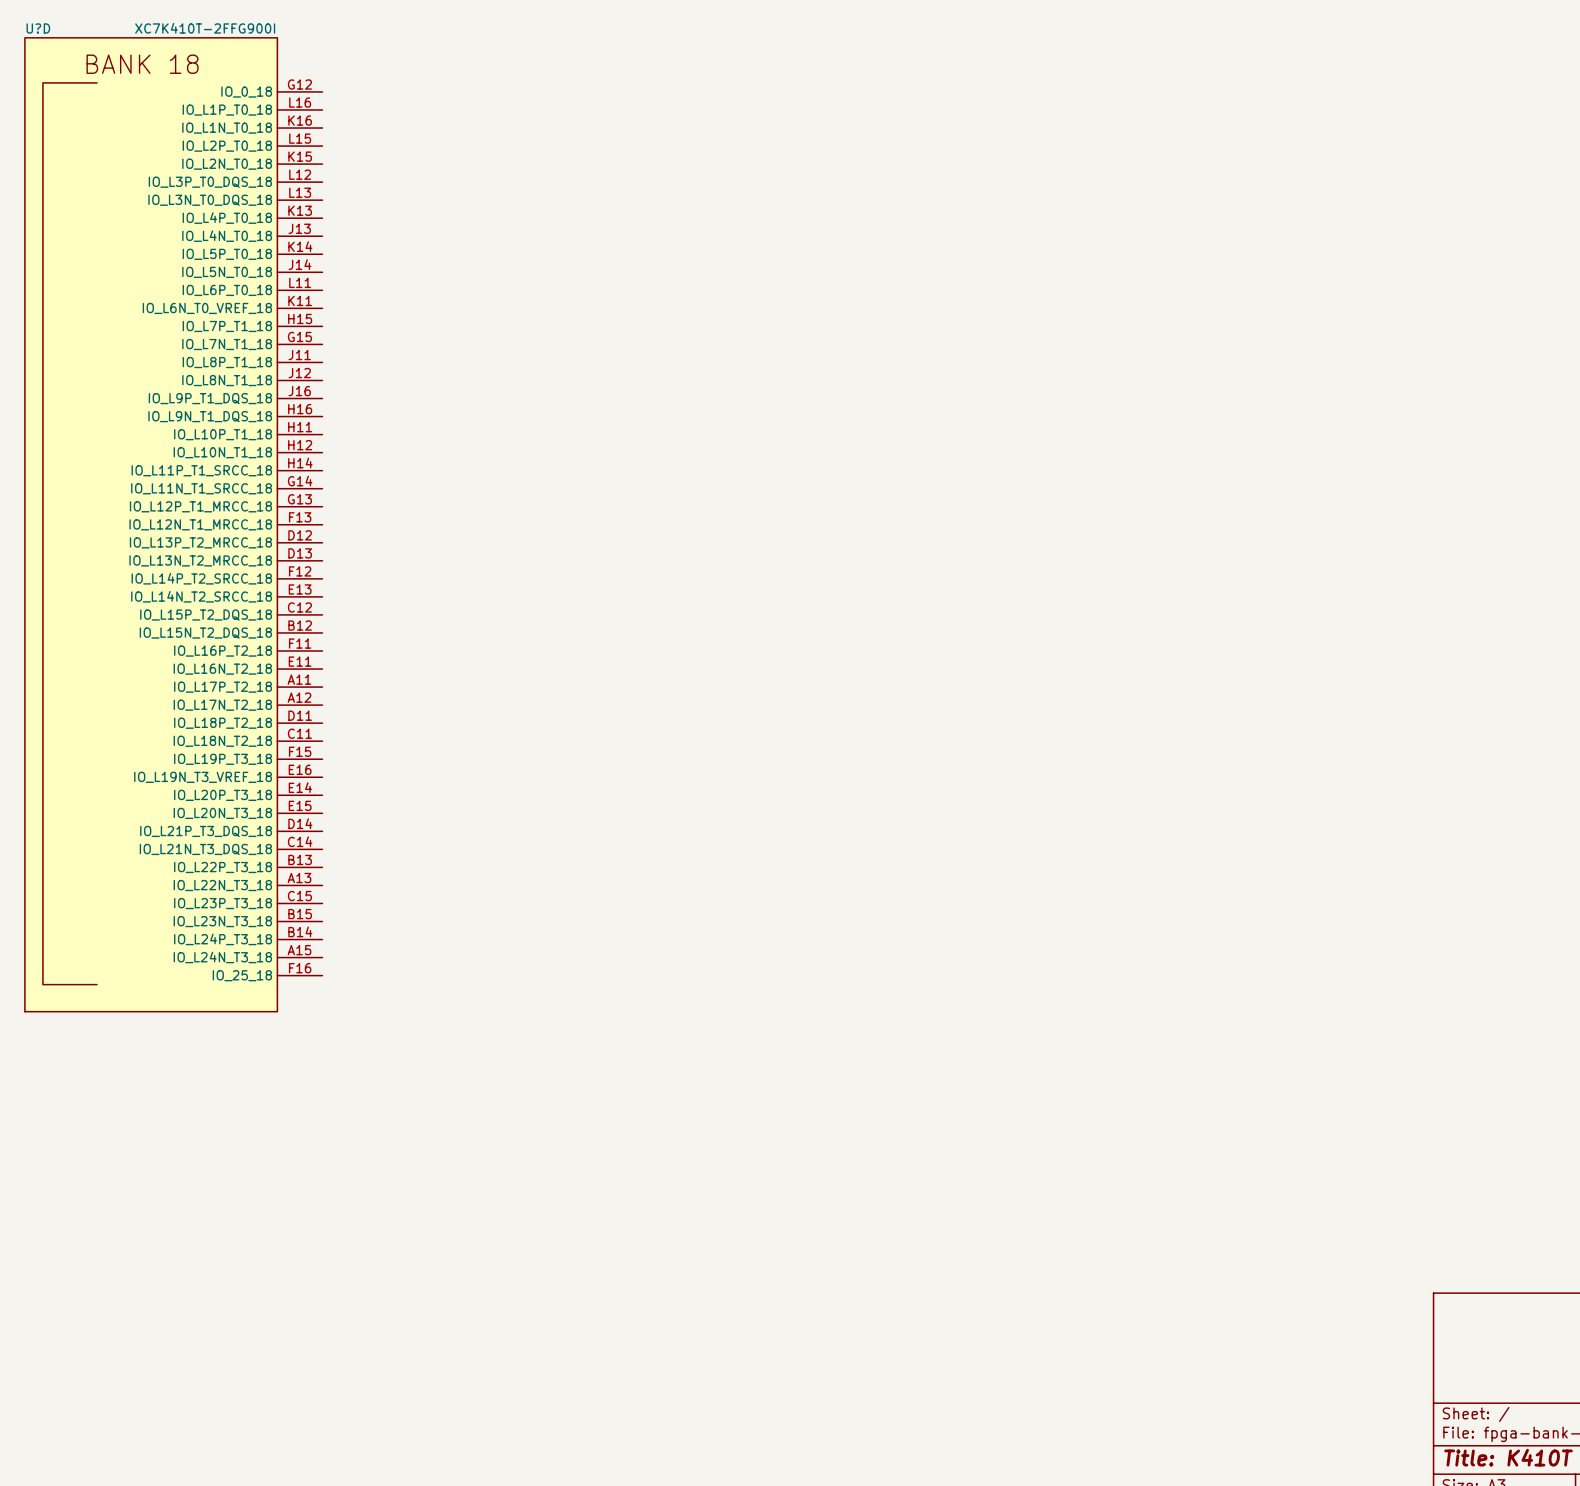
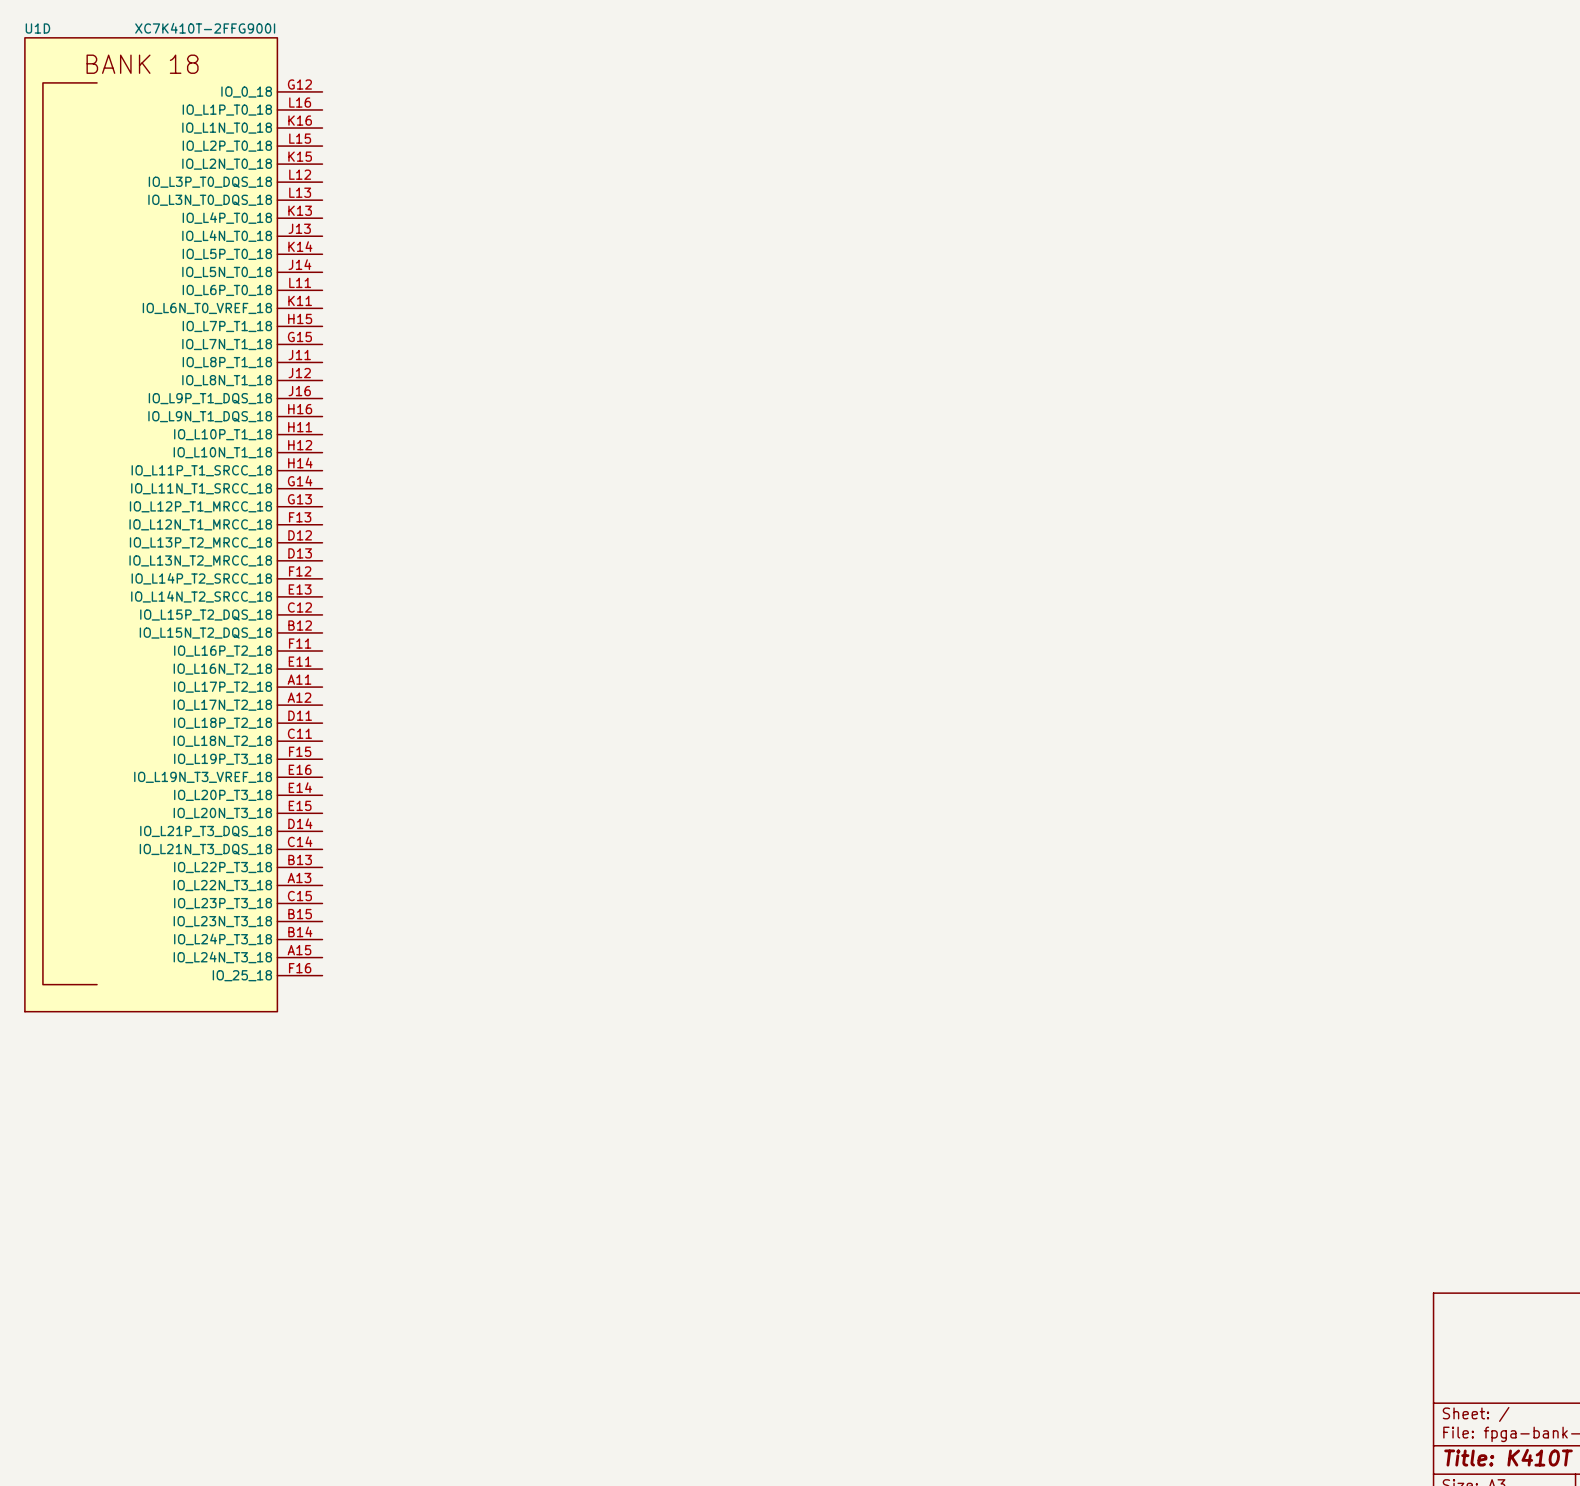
U?D name: U?D (38, 28) -> U1D (37, 28)

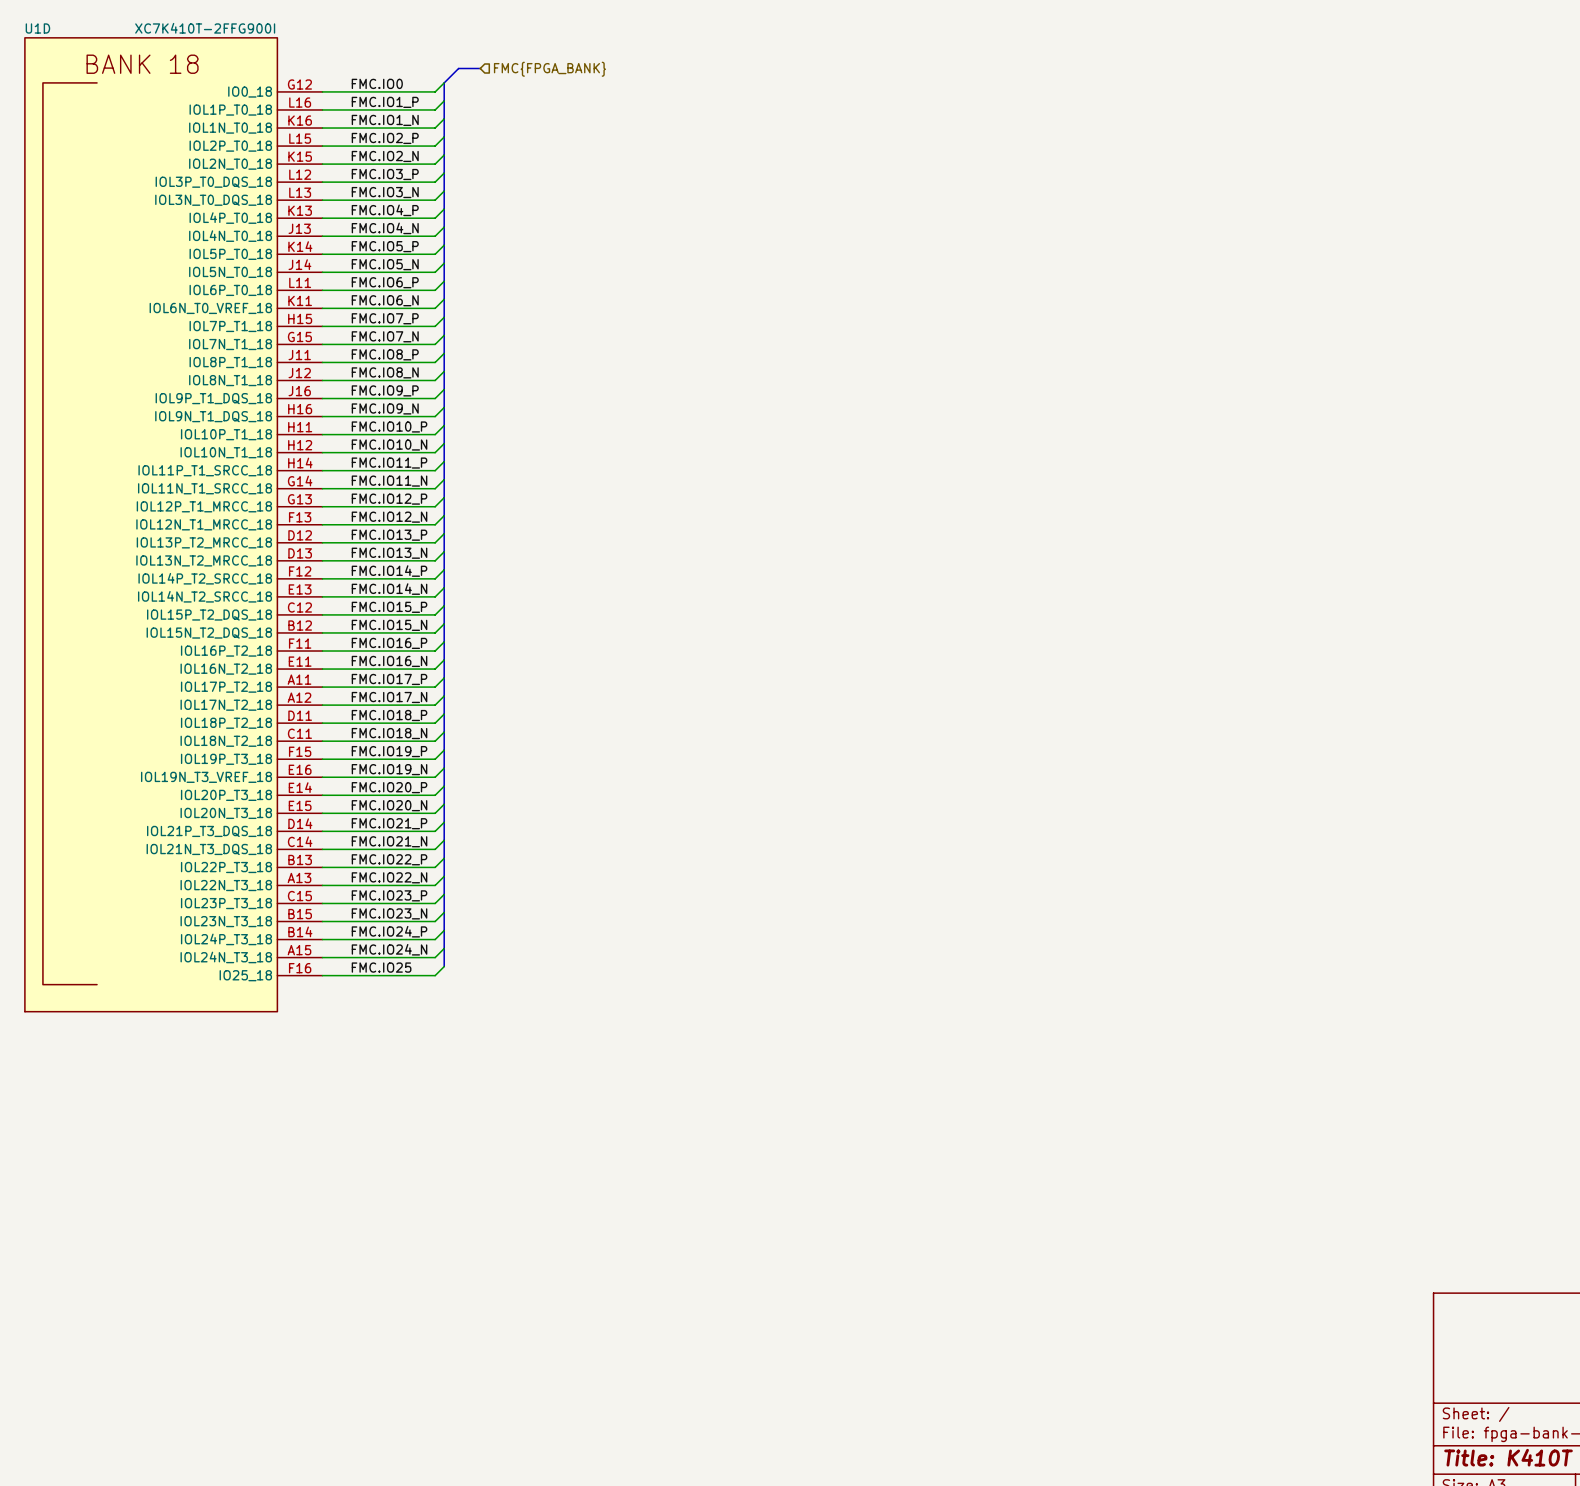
U1D symbol: [24, 37, 323, 1013] -> [24, 37, 323, 1013]
bus: none -> (480, 68) (458, 68) (444, 82) (444, 966)
hierarchical label: none -> FMC{FPGA_BANK} (549, 69)
wire: none -> (444, 82) (435, 91) (322, 91)
label: none -> FMC.IO0 (377, 83)
wire: none -> (444, 100) (435, 109) (322, 109)
label: none -> FMC.IO1_P (385, 102)
wire: none -> (444, 119) (435, 128) (322, 128)
label: none -> FMC.IO1_N (385, 120)
wire: none -> (444, 137) (435, 146) (322, 146)
label: none -> FMC.IO2_P (385, 138)
wire: none -> (444, 155) (435, 164) (322, 164)
label: none -> FMC.IO2_N (385, 156)
wire: none -> (444, 173) (435, 182) (322, 182)
label: none -> FMC.IO3_P (385, 174)
wire: none -> (444, 191) (435, 200) (322, 200)
label: none -> FMC.IO3_N (385, 192)
wire: none -> (444, 209) (435, 218) (322, 218)
label: none -> FMC.IO4_P (385, 210)
wire: none -> (444, 227) (435, 236) (322, 236)
label: none -> FMC.IO4_N (385, 228)
wire: none -> (444, 245) (435, 254) (322, 254)
label: none -> FMC.IO5_P (385, 246)
wire: none -> (444, 263) (435, 272) (322, 272)
label: none -> FMC.IO5_N (385, 264)
wire: none -> (444, 281) (435, 290) (322, 290)
label: none -> FMC.IO6_P (385, 282)
wire: none -> (444, 299) (435, 308) (322, 308)
label: none -> FMC.IO6_N (385, 300)
wire: none -> (444, 317) (435, 326) (322, 326)
label: none -> FMC.IO7_P (385, 318)
wire: none -> (444, 335) (435, 344) (322, 344)
label: none -> FMC.IO7_N (385, 336)
wire: none -> (444, 353) (435, 362) (322, 362)
label: none -> FMC.IO8_P (385, 354)
wire: none -> (444, 371) (435, 380) (322, 380)
label: none -> FMC.IO8_N (385, 372)
wire: none -> (444, 389) (435, 398) (322, 398)
label: none -> FMC.IO9_P (385, 390)
wire: none -> (444, 407) (435, 416) (322, 416)
label: none -> FMC.IO9_N (385, 408)
wire: none -> (444, 425) (435, 434) (322, 434)
label: none -> FMC.IO10_P (389, 426)
wire: none -> (444, 443) (435, 452) (322, 452)
label: none -> FMC.IO10_N (389, 445)
wire: none -> (444, 461) (435, 470) (322, 470)
label: none -> FMC.IO11_P (389, 463)
wire: none -> (444, 479) (435, 488) (322, 488)
label: none -> FMC.IO11_N (389, 481)
wire: none -> (444, 497) (435, 506) (322, 506)
label: none -> FMC.IO12_P (389, 499)
wire: none -> (444, 515) (435, 524) (322, 524)
label: none -> FMC.IO12_N (389, 517)
wire: none -> (444, 533) (435, 542) (322, 542)
label: none -> FMC.IO13_P (389, 535)
wire: none -> (444, 551) (435, 560) (322, 560)
label: none -> FMC.IO13_N (389, 553)
wire: none -> (444, 569) (435, 578) (322, 578)
label: none -> FMC.IO14_P (389, 571)
wire: none -> (444, 587) (435, 596) (322, 596)
label: none -> FMC.IO14_N (389, 589)
wire: none -> (444, 605) (435, 614) (322, 614)
label: none -> FMC.IO15_P (389, 607)
wire: none -> (444, 623) (435, 632) (322, 632)
label: none -> FMC.IO15_N (389, 625)
wire: none -> (444, 641) (435, 651) (322, 651)
label: none -> FMC.IO16_P (389, 643)
wire: none -> (444, 660) (435, 669) (322, 669)
label: none -> FMC.IO16_N (389, 661)
wire: none -> (444, 678) (435, 687) (322, 687)
label: none -> FMC.IO17_P (389, 679)
wire: none -> (444, 696) (435, 705) (322, 705)
label: none -> FMC.IO17_N (389, 697)
wire: none -> (444, 714) (435, 723) (322, 723)
label: none -> FMC.IO18_P (389, 715)
wire: none -> (444, 732) (435, 741) (322, 741)
label: none -> FMC.IO18_N (389, 733)
wire: none -> (444, 750) (435, 759) (322, 759)
label: none -> FMC.IO19_P (389, 751)
wire: none -> (444, 768) (435, 777) (322, 777)
label: none -> FMC.IO19_N (389, 769)
wire: none -> (444, 786) (435, 795) (322, 795)
label: none -> FMC.IO20_P (389, 787)
wire: none -> (444, 804) (435, 813) (322, 813)
label: none -> FMC.IO20_N (389, 805)
wire: none -> (444, 822) (435, 831) (322, 831)
label: none -> FMC.IO21_P (389, 823)
wire: none -> (444, 840) (435, 849) (322, 849)
label: none -> FMC.IO21_N (389, 841)
wire: none -> (444, 858) (435, 867) (322, 867)
label: none -> FMC.IO22_P (389, 859)
wire: none -> (444, 876) (435, 885) (322, 885)
label: none -> FMC.IO22_N (389, 877)
wire: none -> (444, 894) (435, 903) (322, 903)
label: none -> FMC.IO23_P (389, 895)
wire: none -> (444, 912) (435, 921) (322, 921)
label: none -> FMC.IO23_N (389, 913)
wire: none -> (444, 930) (435, 939) (322, 939)
label: none -> FMC.IO24_P (389, 931)
wire: none -> (444, 948) (435, 957) (322, 957)
label: none -> FMC.IO24_N (389, 949)
wire: none -> (444, 966) (435, 975) (322, 975)
label: none -> FMC.IO25 (381, 967)

